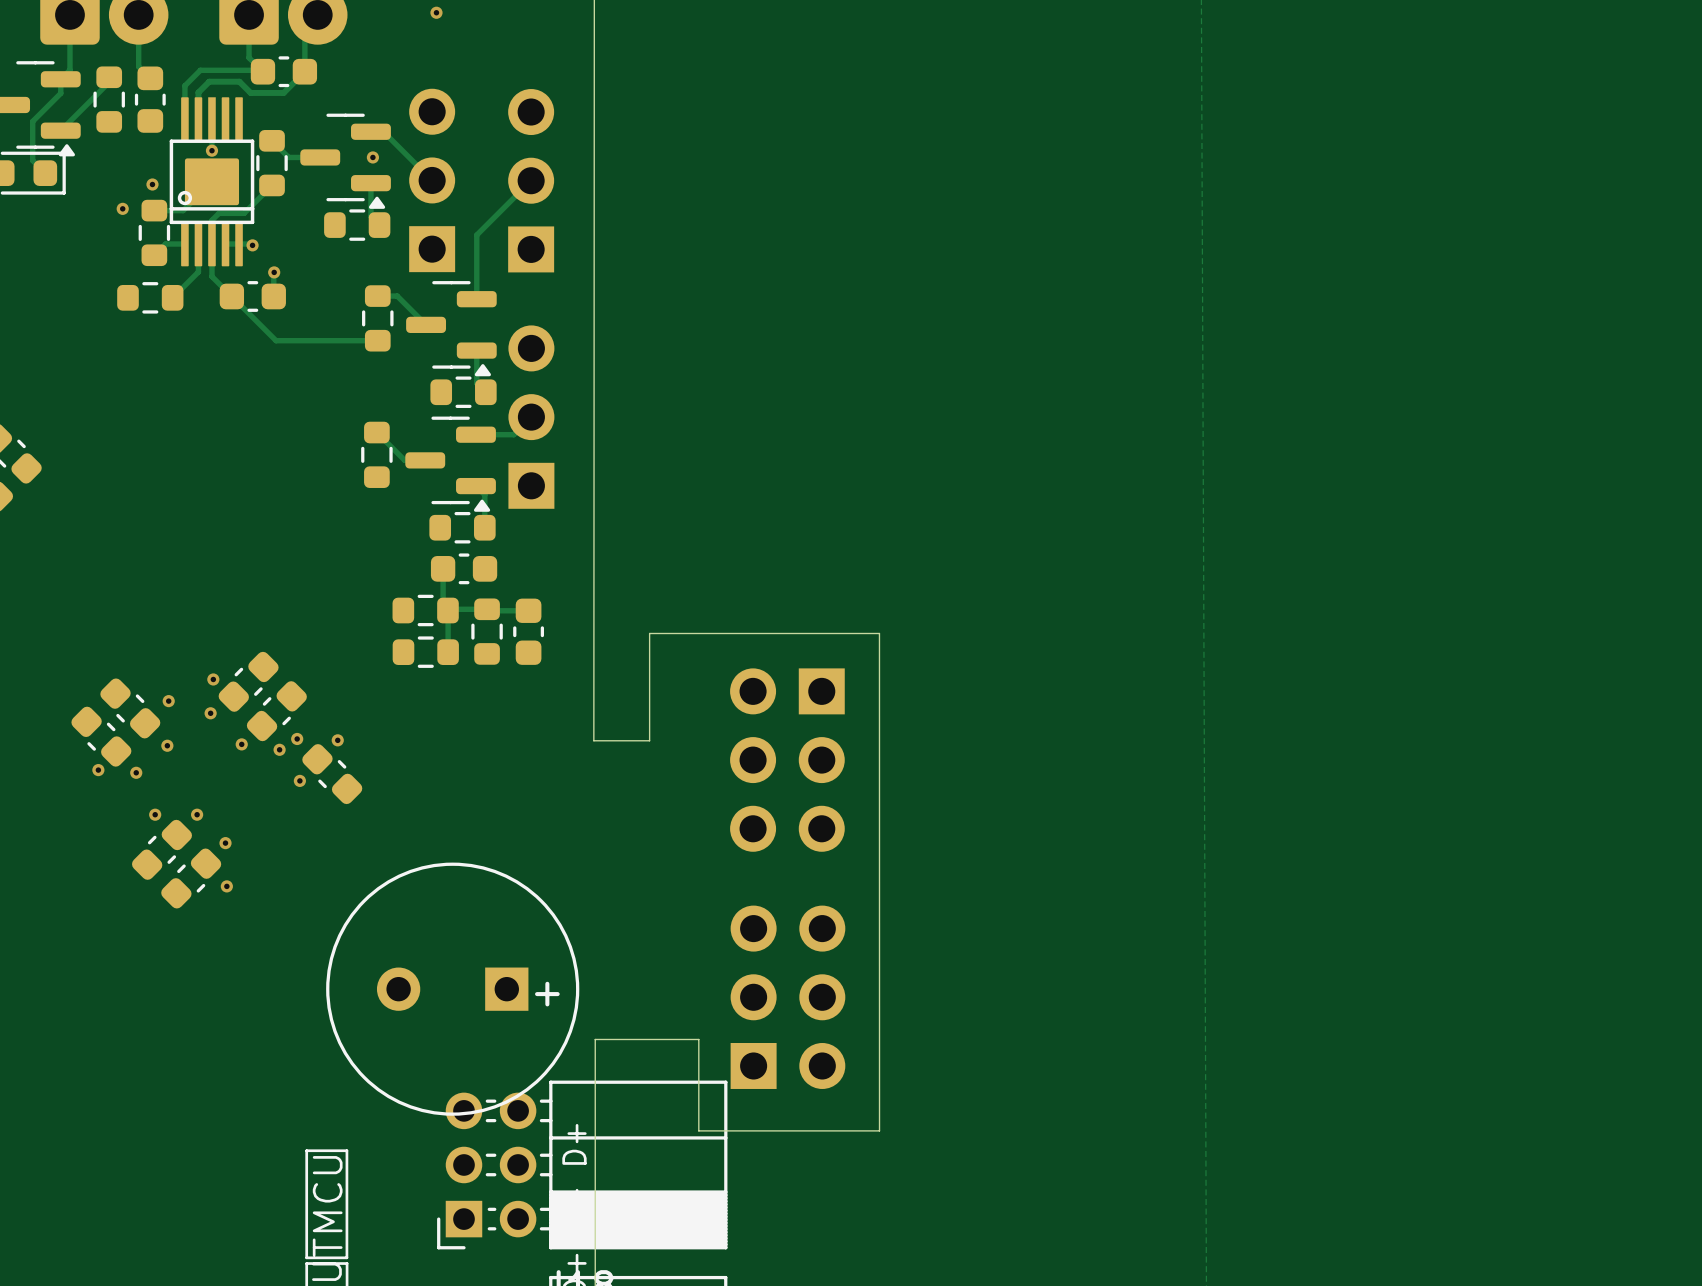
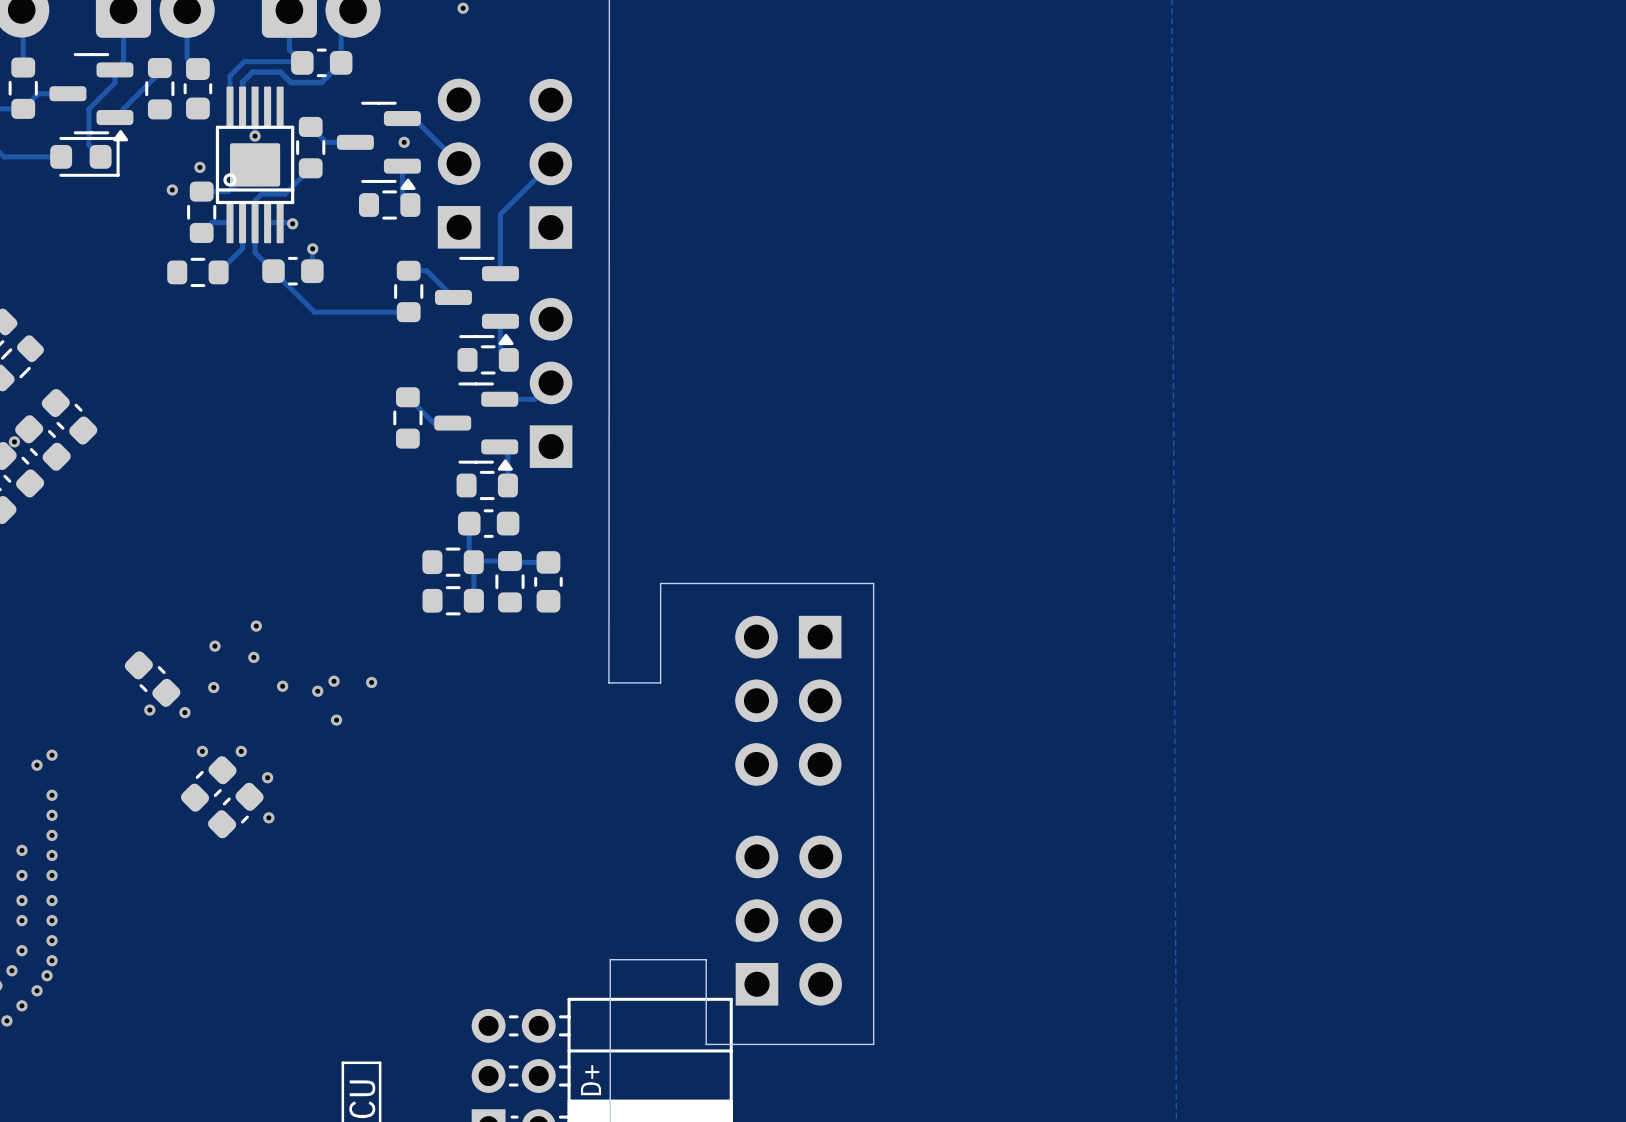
part: (248, 681) -> none
part: (130, 708) -> none
part: (276, 711) -> none
part: (332, 774) -> none
part: (452, 989) -> none

